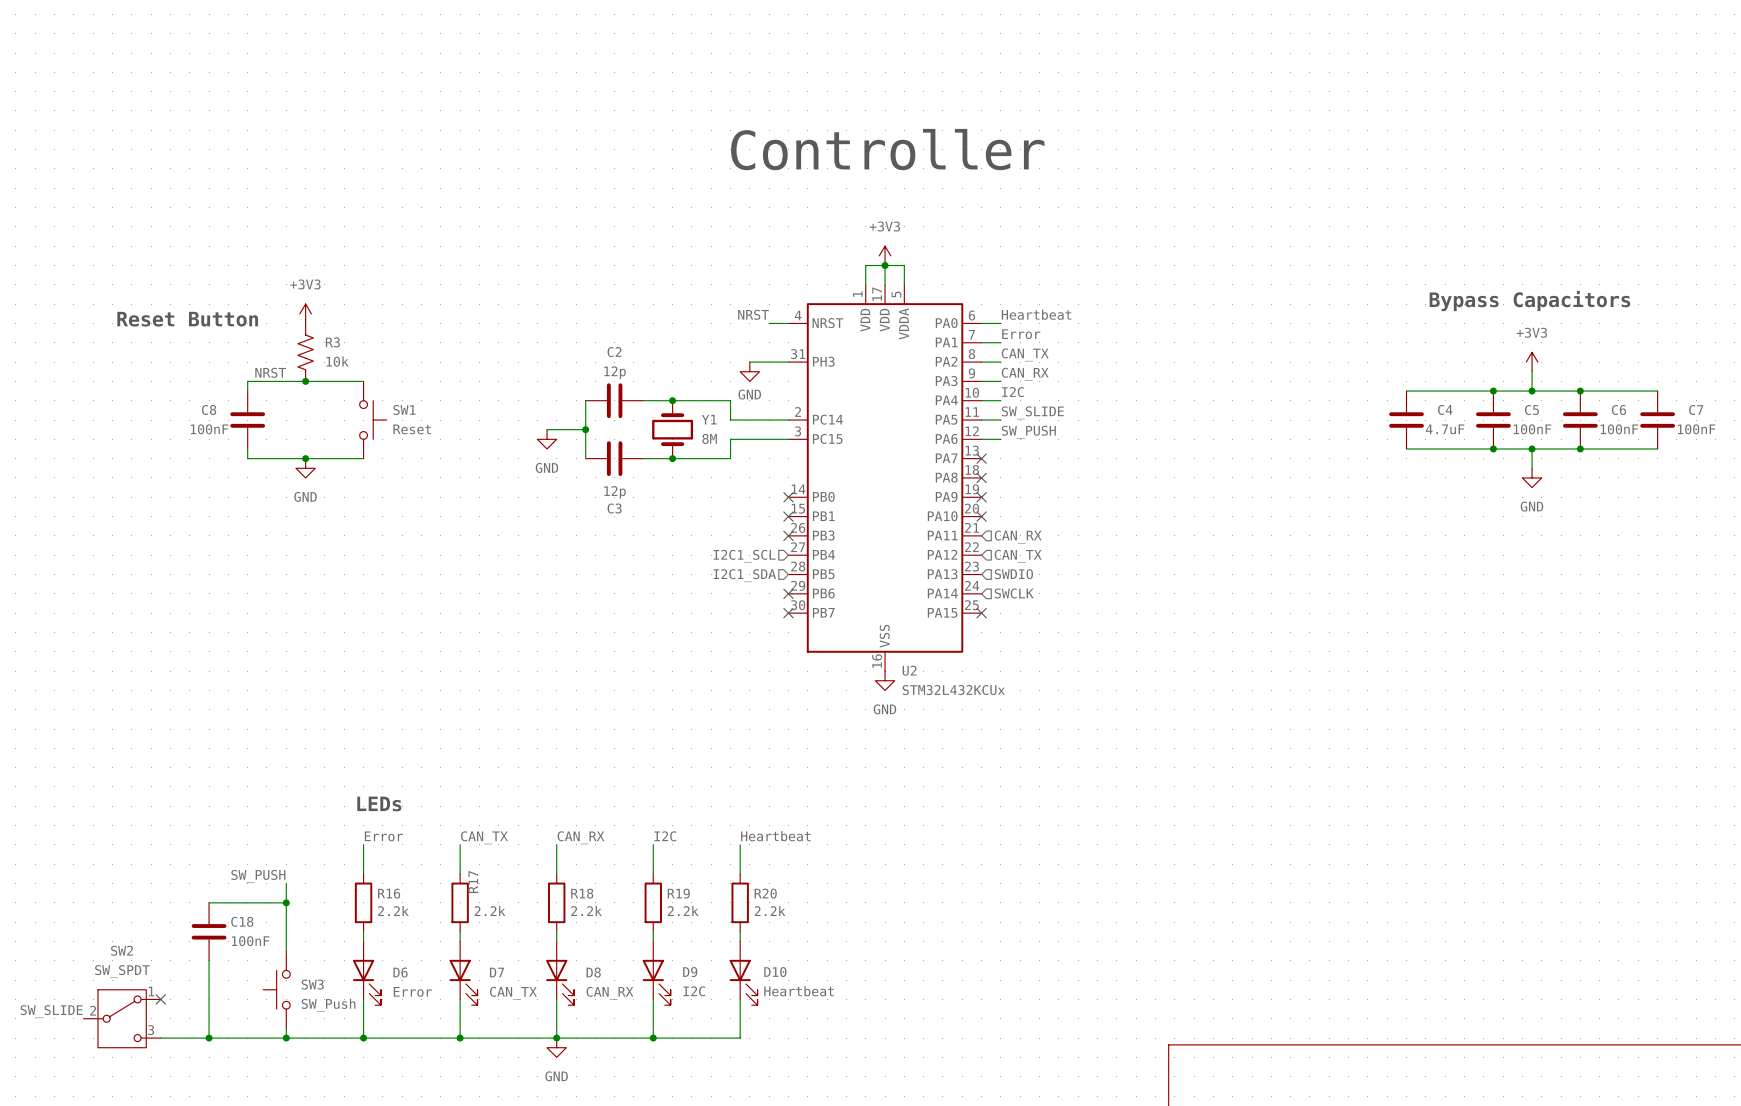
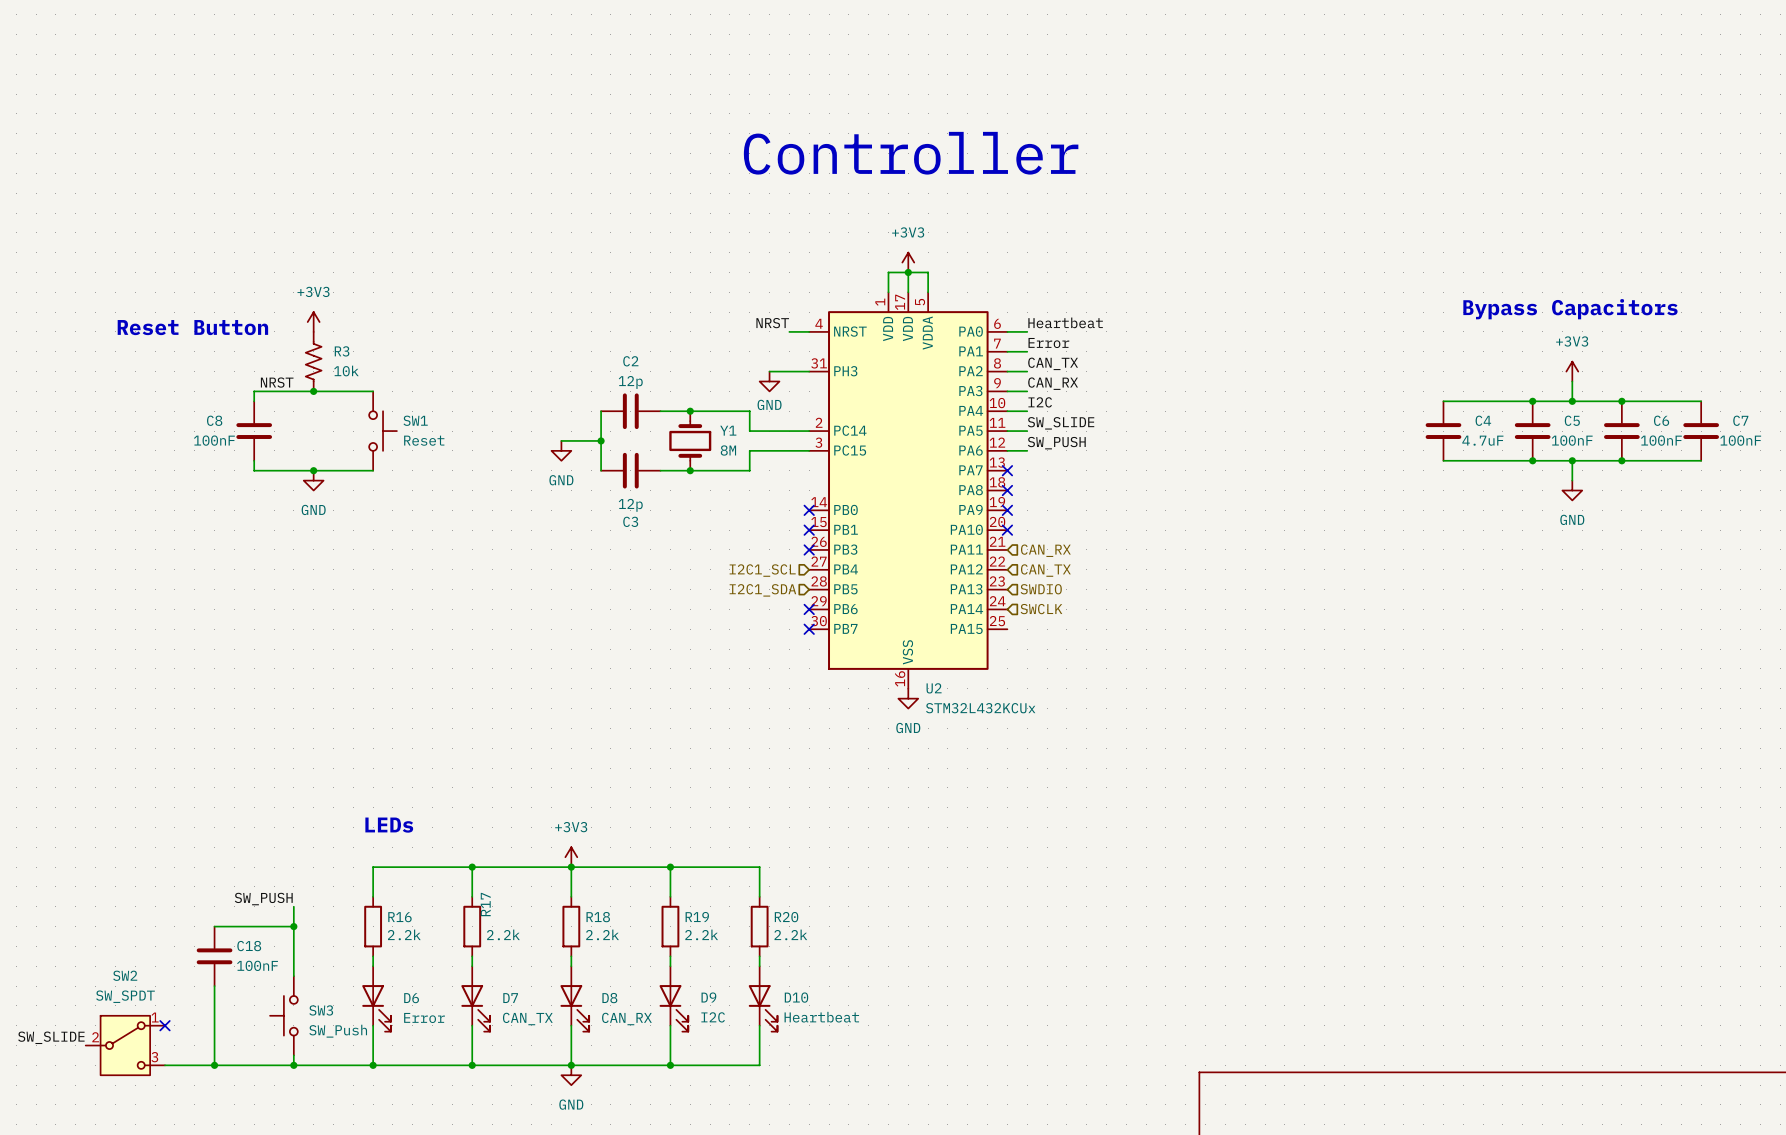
no-connect mark: (981, 613) -> none
power symbol: none -> +3V3 (571, 857)
label: Error (383, 836) -> none
label: I2C (665, 836) -> none
label: Heartbeat (775, 836) -> none
label: CAN_TX (484, 837) -> none
label: CAN_RX (581, 837) -> none
wire: none -> (373, 867) (759, 867)
junction: none -> (472, 867)
junction: none -> (571, 867)
junction: none -> (670, 867)

